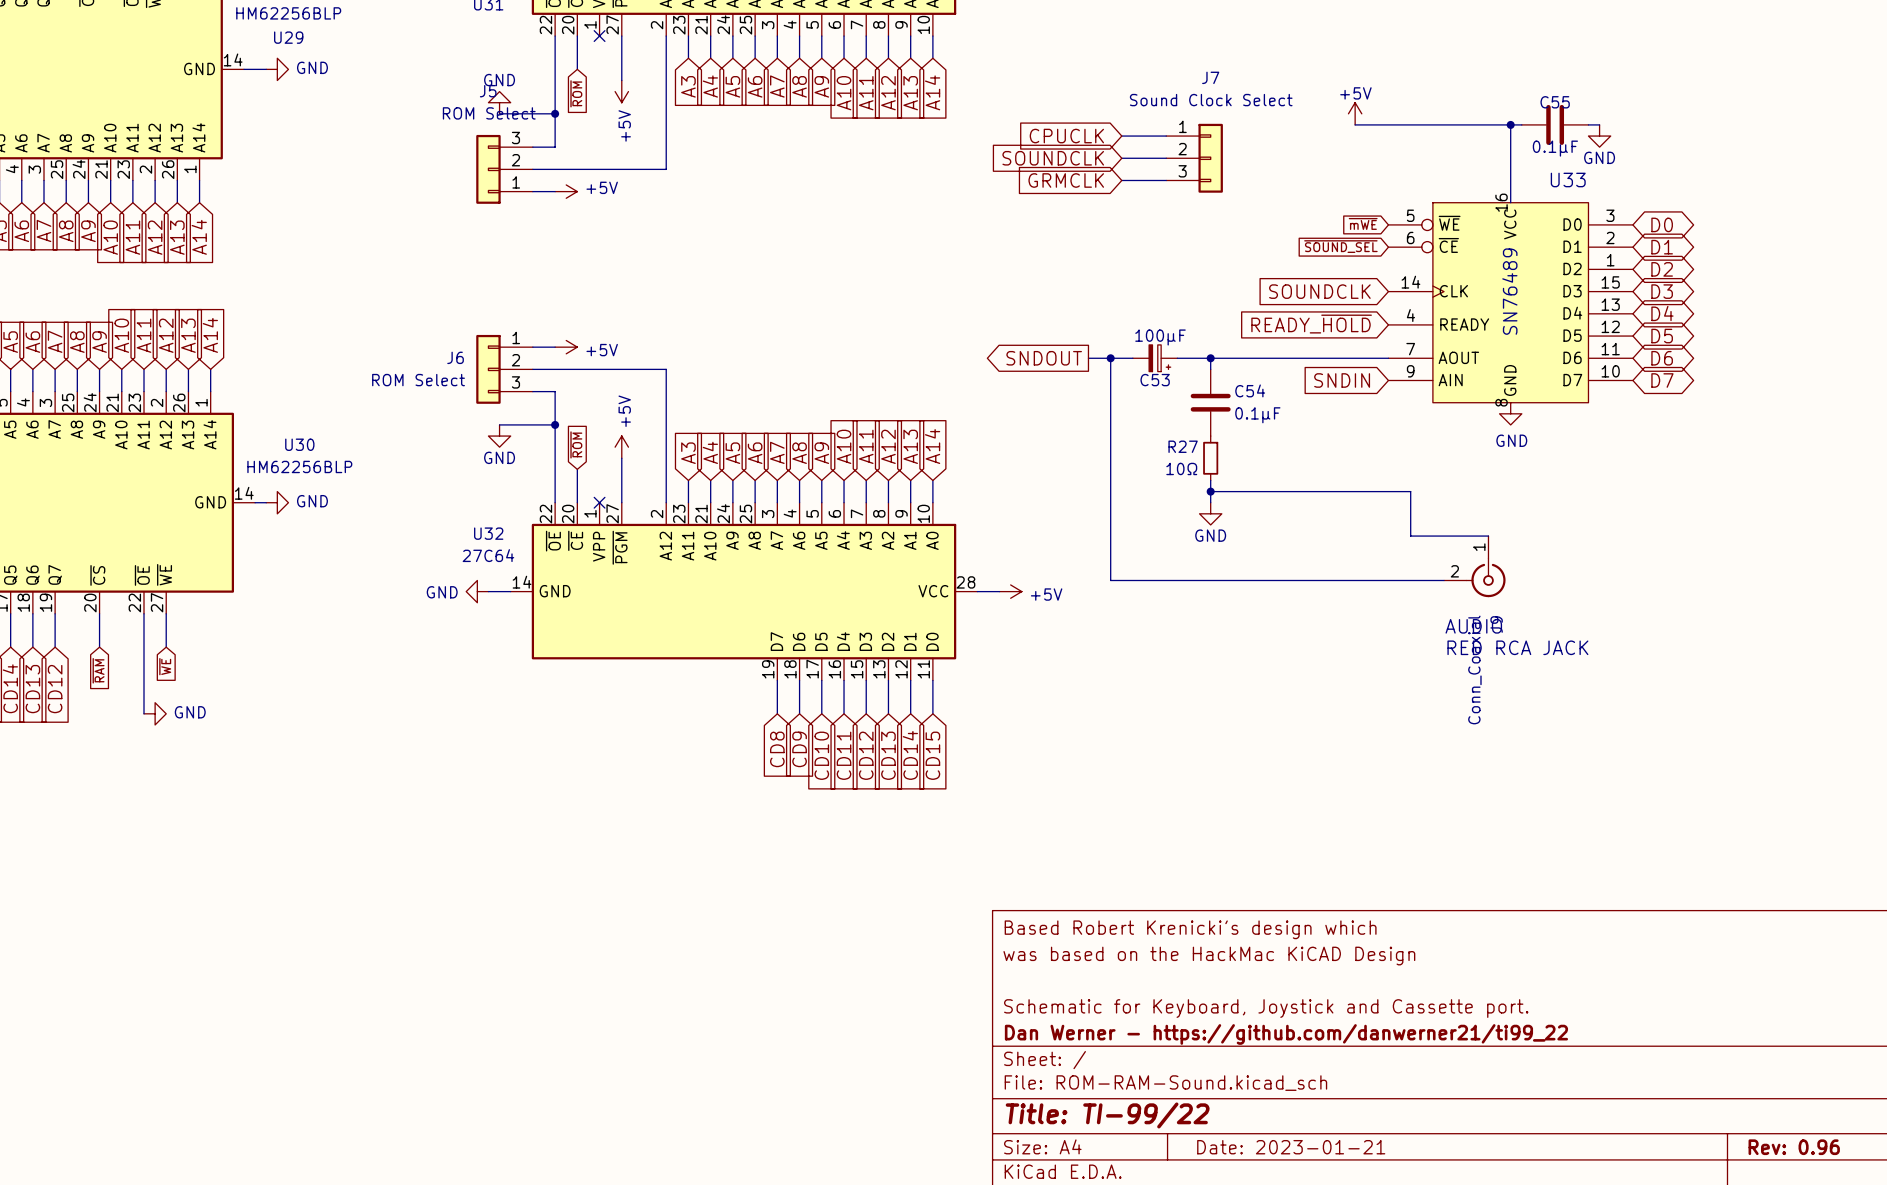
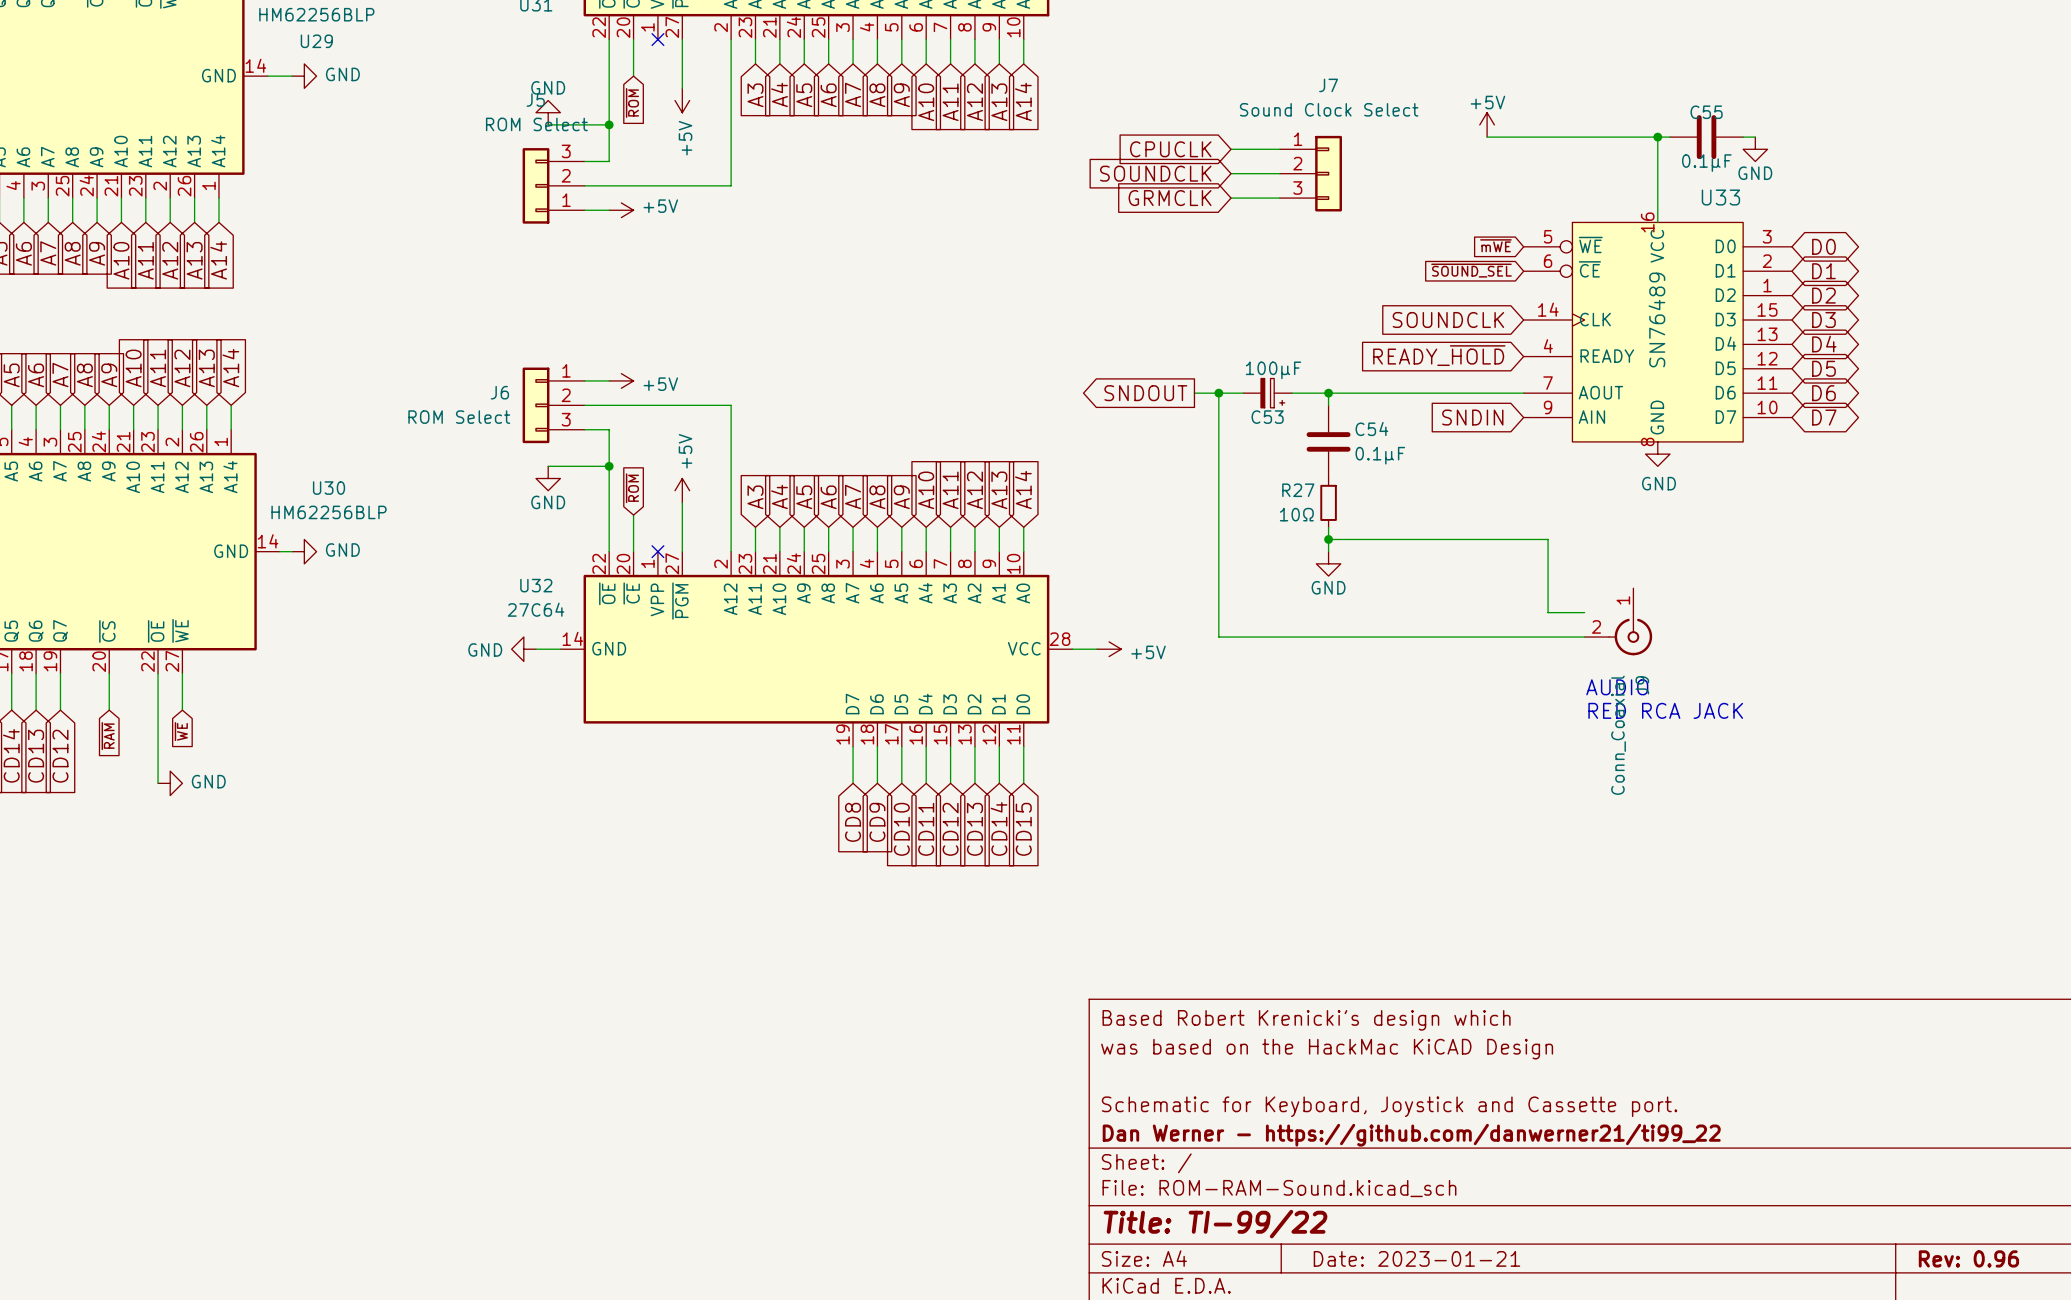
wire: (1410, 536) (1488, 536) -> (1548, 588) (1548, 612) (1584, 612)

